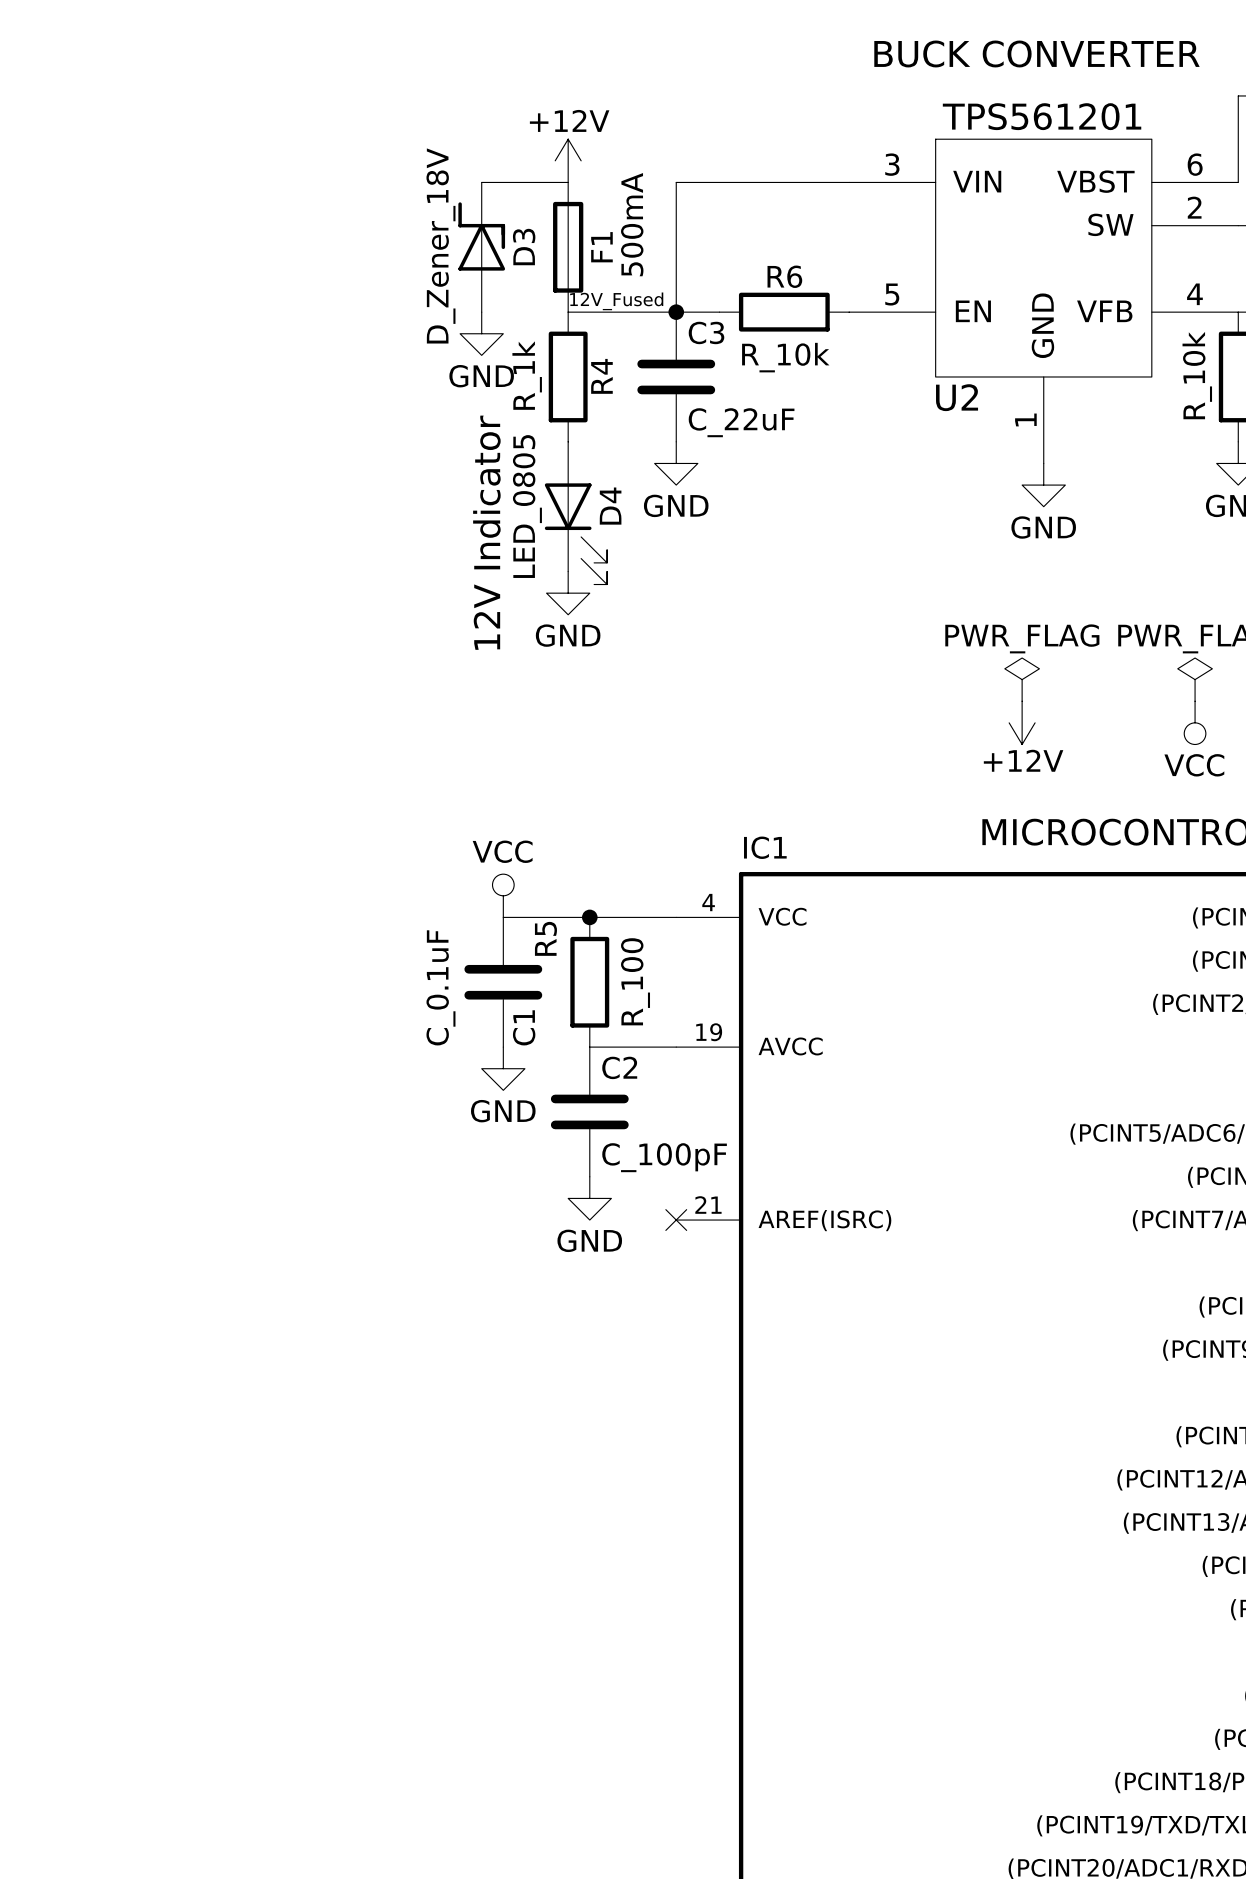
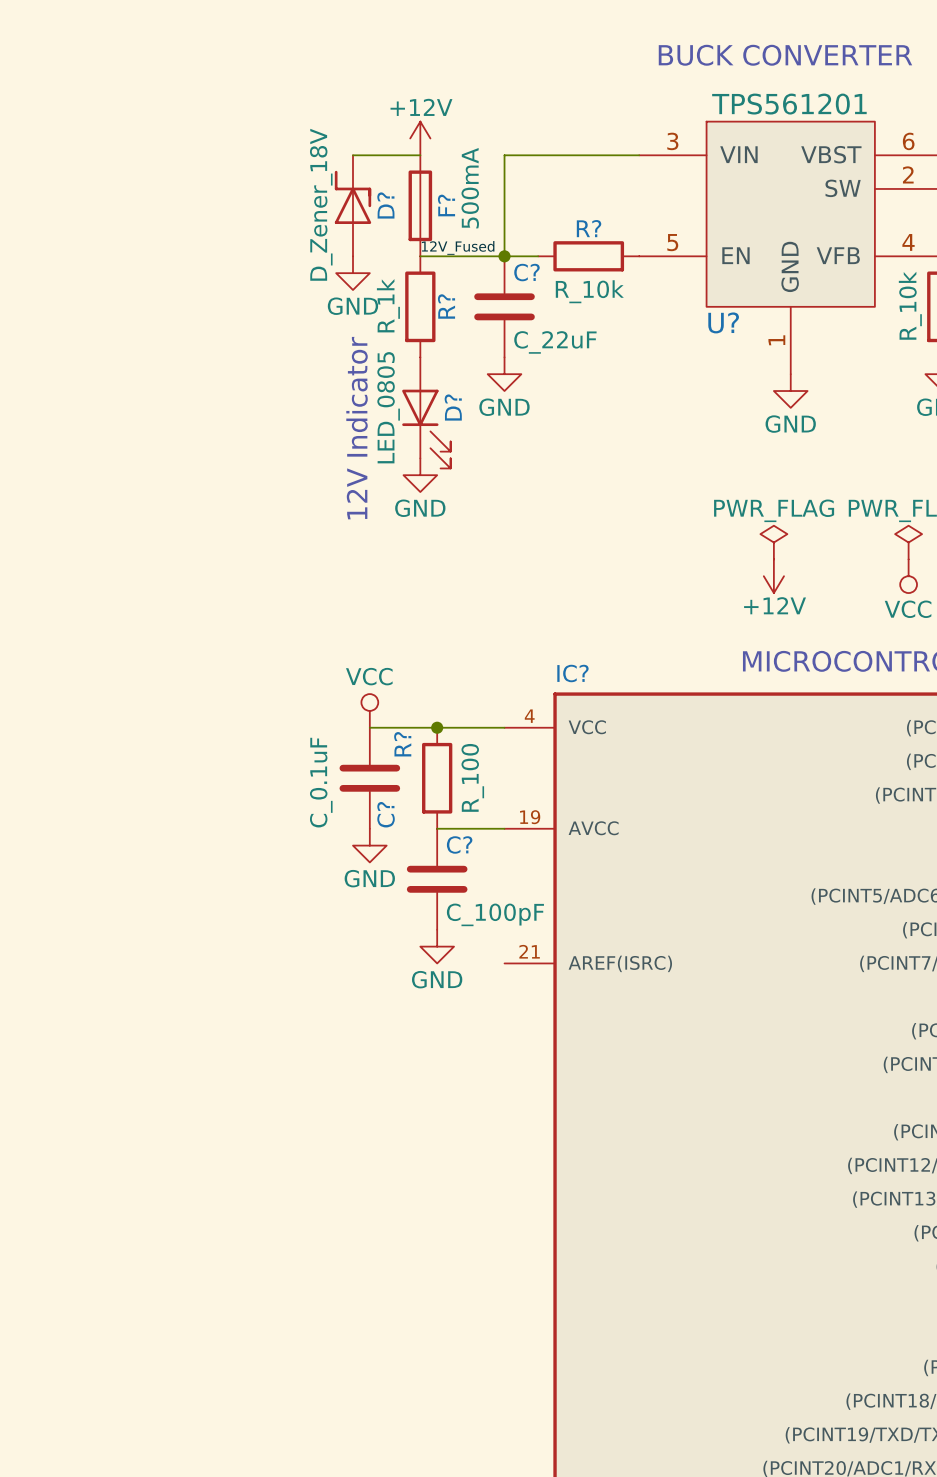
D3 name: D3 (524, 247) -> D? (385, 205)
F1 name: F1 (601, 247) -> F? (446, 205)
R6 name: R6 (784, 276) -> R? (589, 228)
C3 name: C3 (706, 332) -> C? (526, 272)
R4 name: R4 (601, 376) -> R? (446, 306)
U2 name: U2 (957, 397) -> U? (723, 322)
D4 name: D4 (610, 506) -> D? (453, 407)
IC1 name: IC1 (765, 847) -> IC? (572, 673)
R5 name: R5 (545, 938) -> R? (402, 744)
C1 name: C1 (524, 1027) -> C? (386, 814)
C2 name: C2 (619, 1067) -> C? (459, 844)
no-connect mark: (676, 1220) -> none

